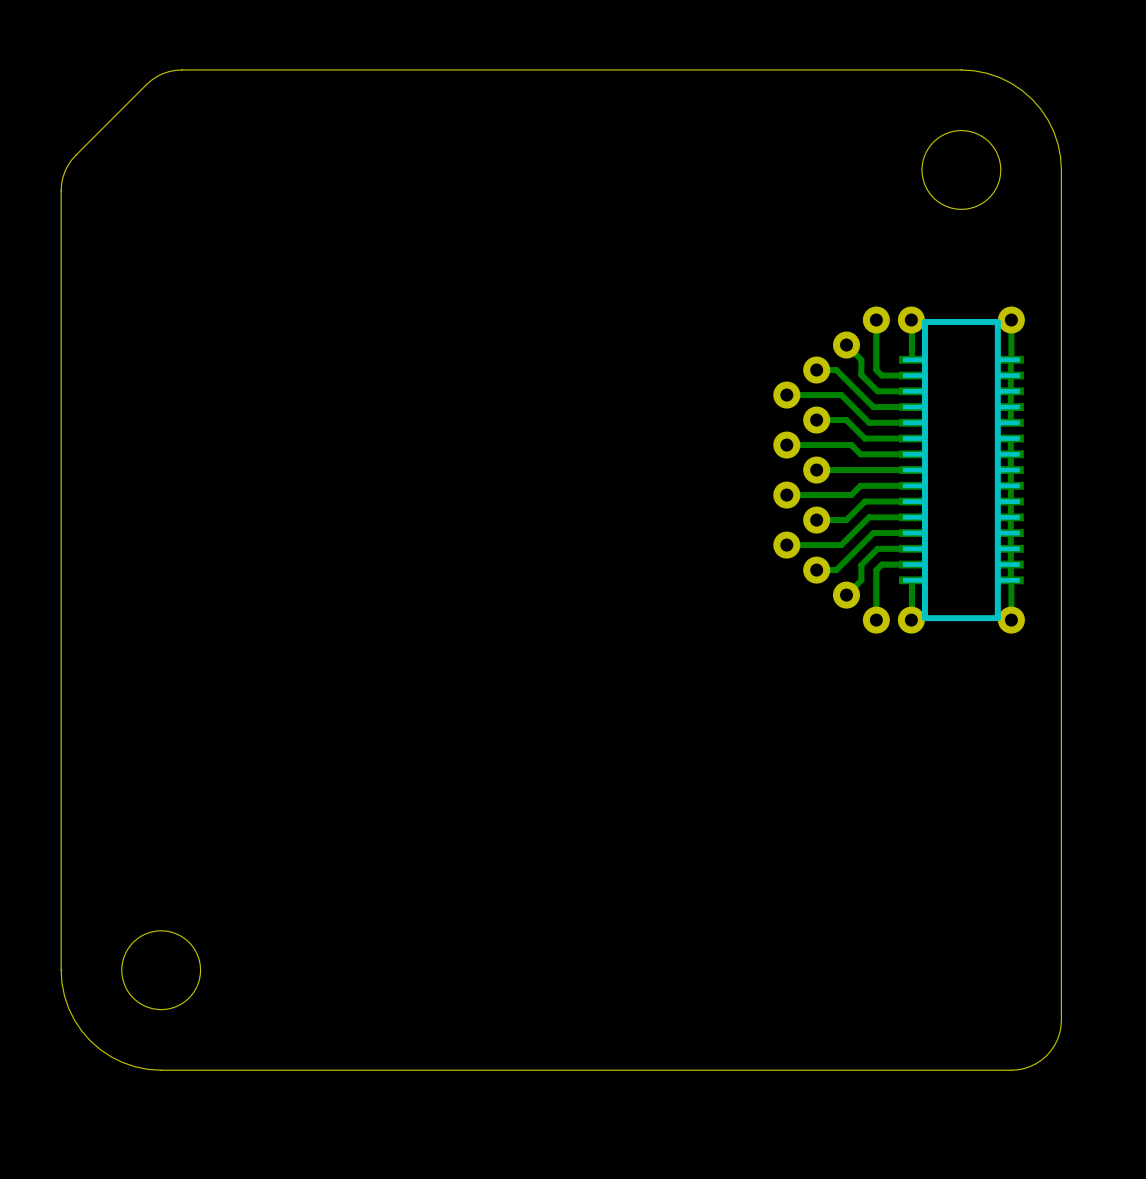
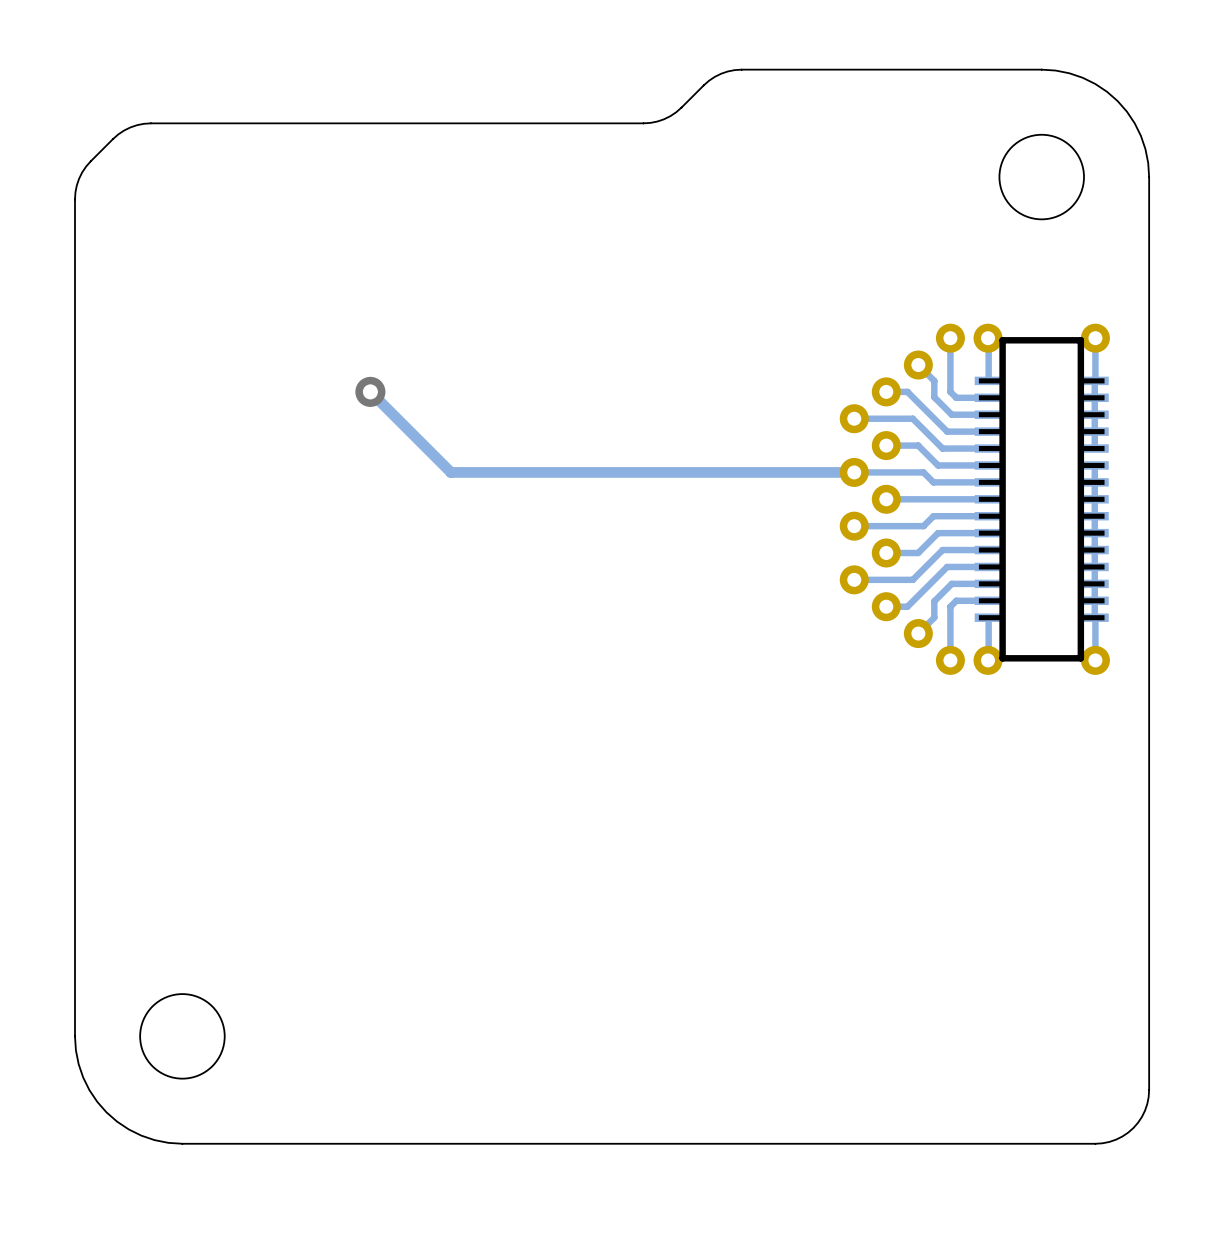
board edge: (682, 69) (175, 70) (162, 73) (151, 80) (96, 134) -> (741, 69) (727, 71) (714, 76) (676, 112) (664, 119) (650, 122) (150, 123) (130, 127) (112, 139)
track: none -> (370, 391) (450, 472) (854, 472)
via: none -> (370, 391)

